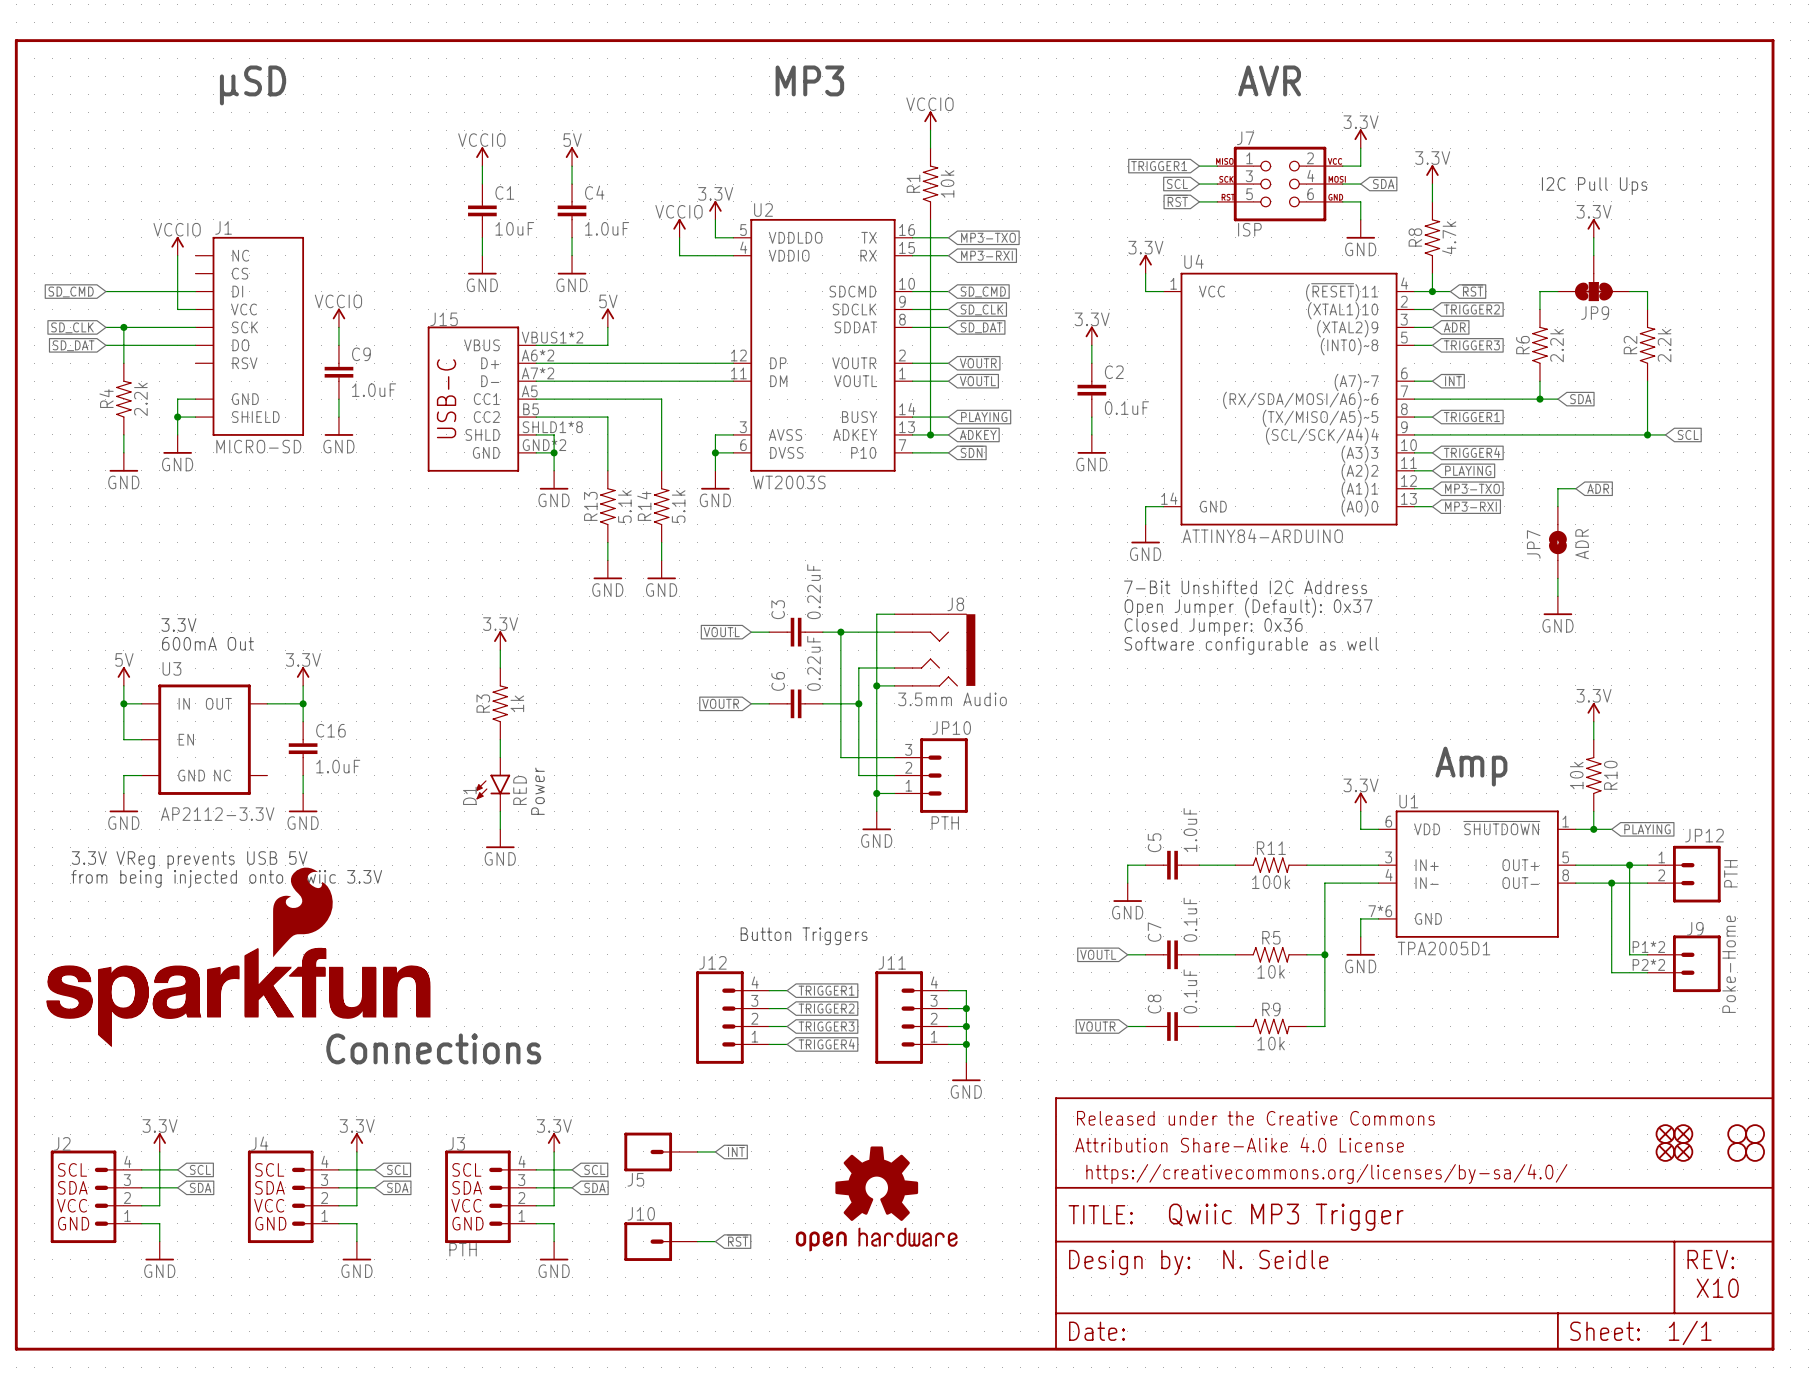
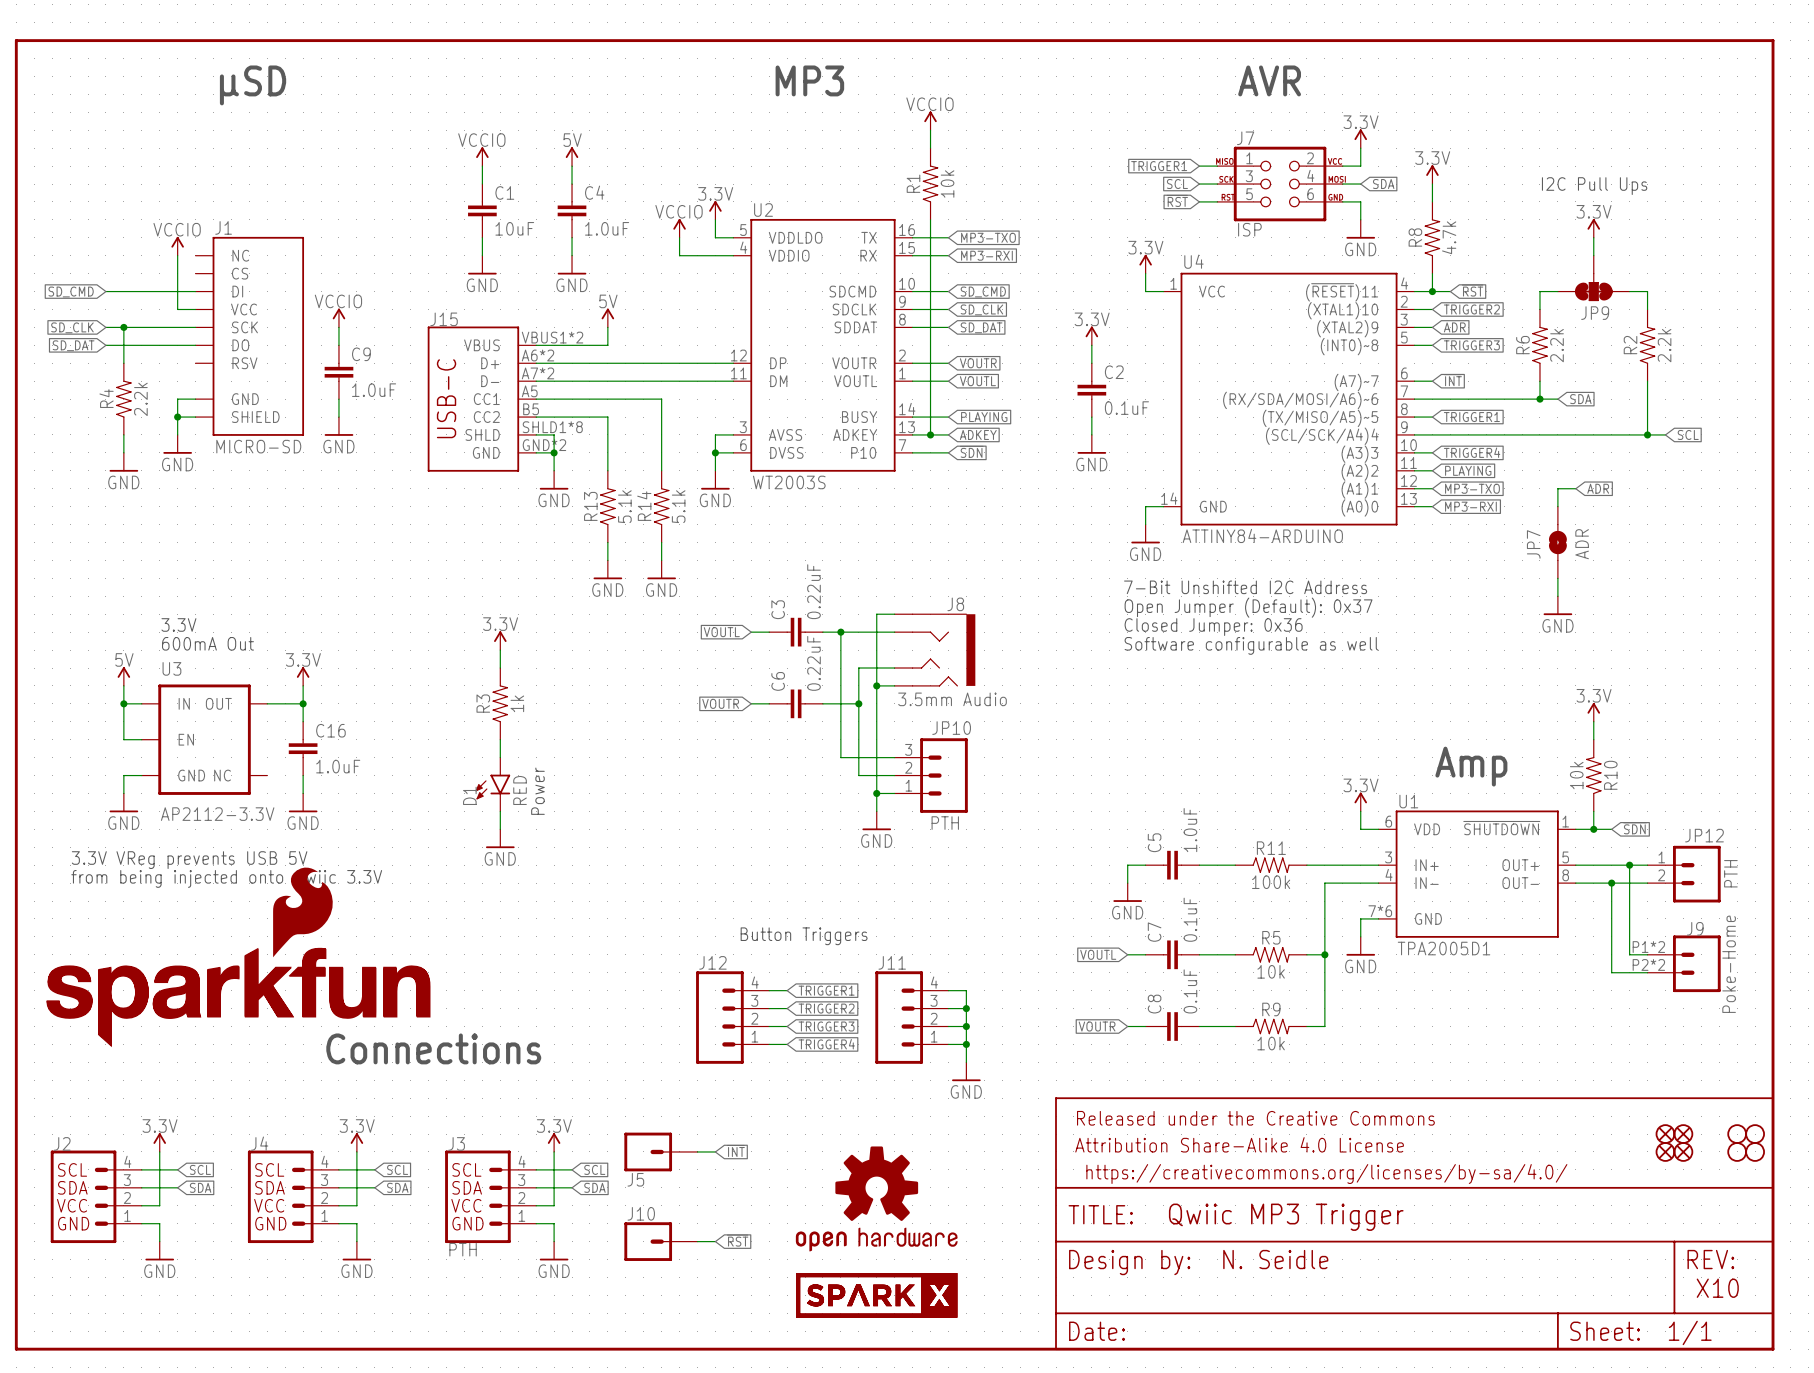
global label: PLAYING (1647, 829) -> ~{SDN} (1635, 828)
part: none -> (876, 1295)

